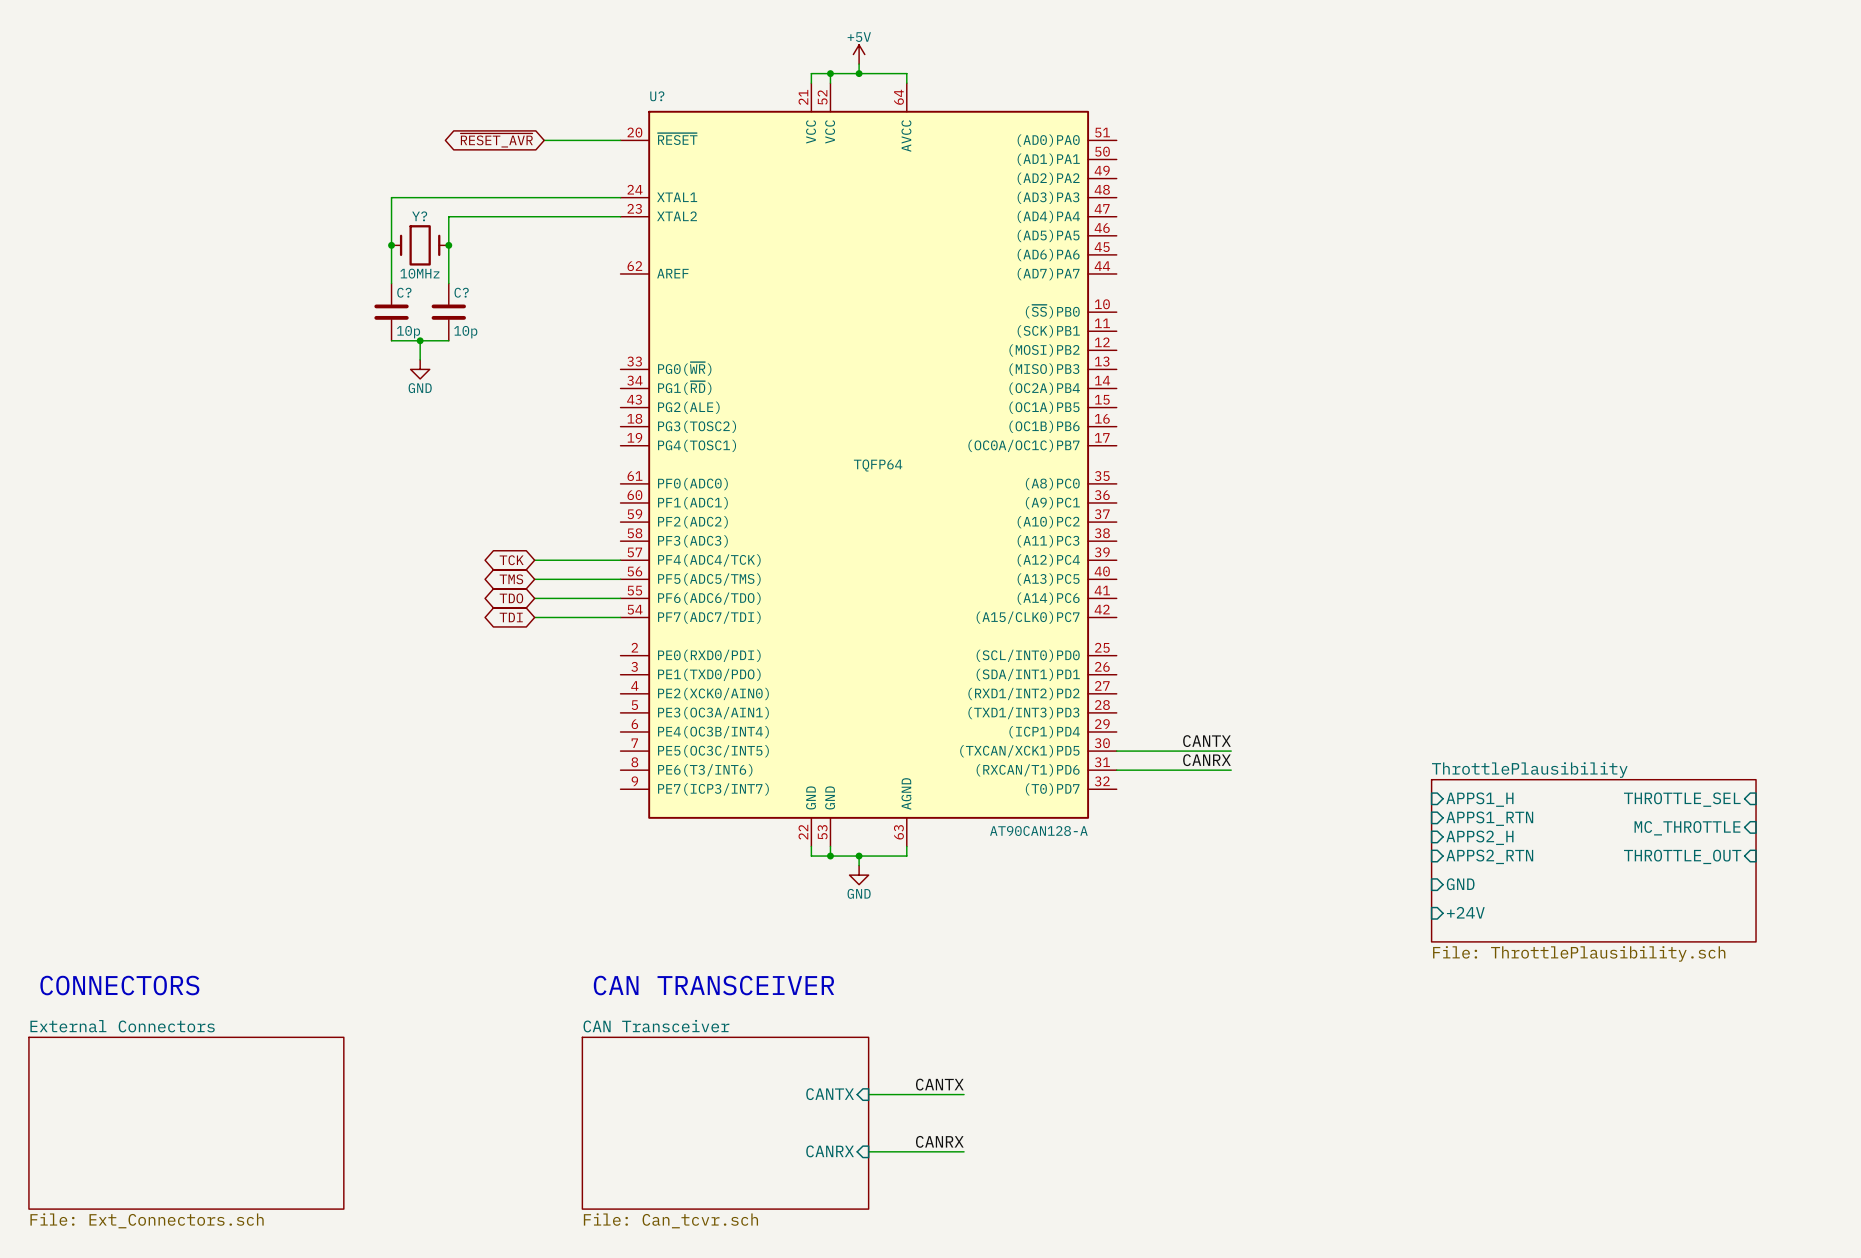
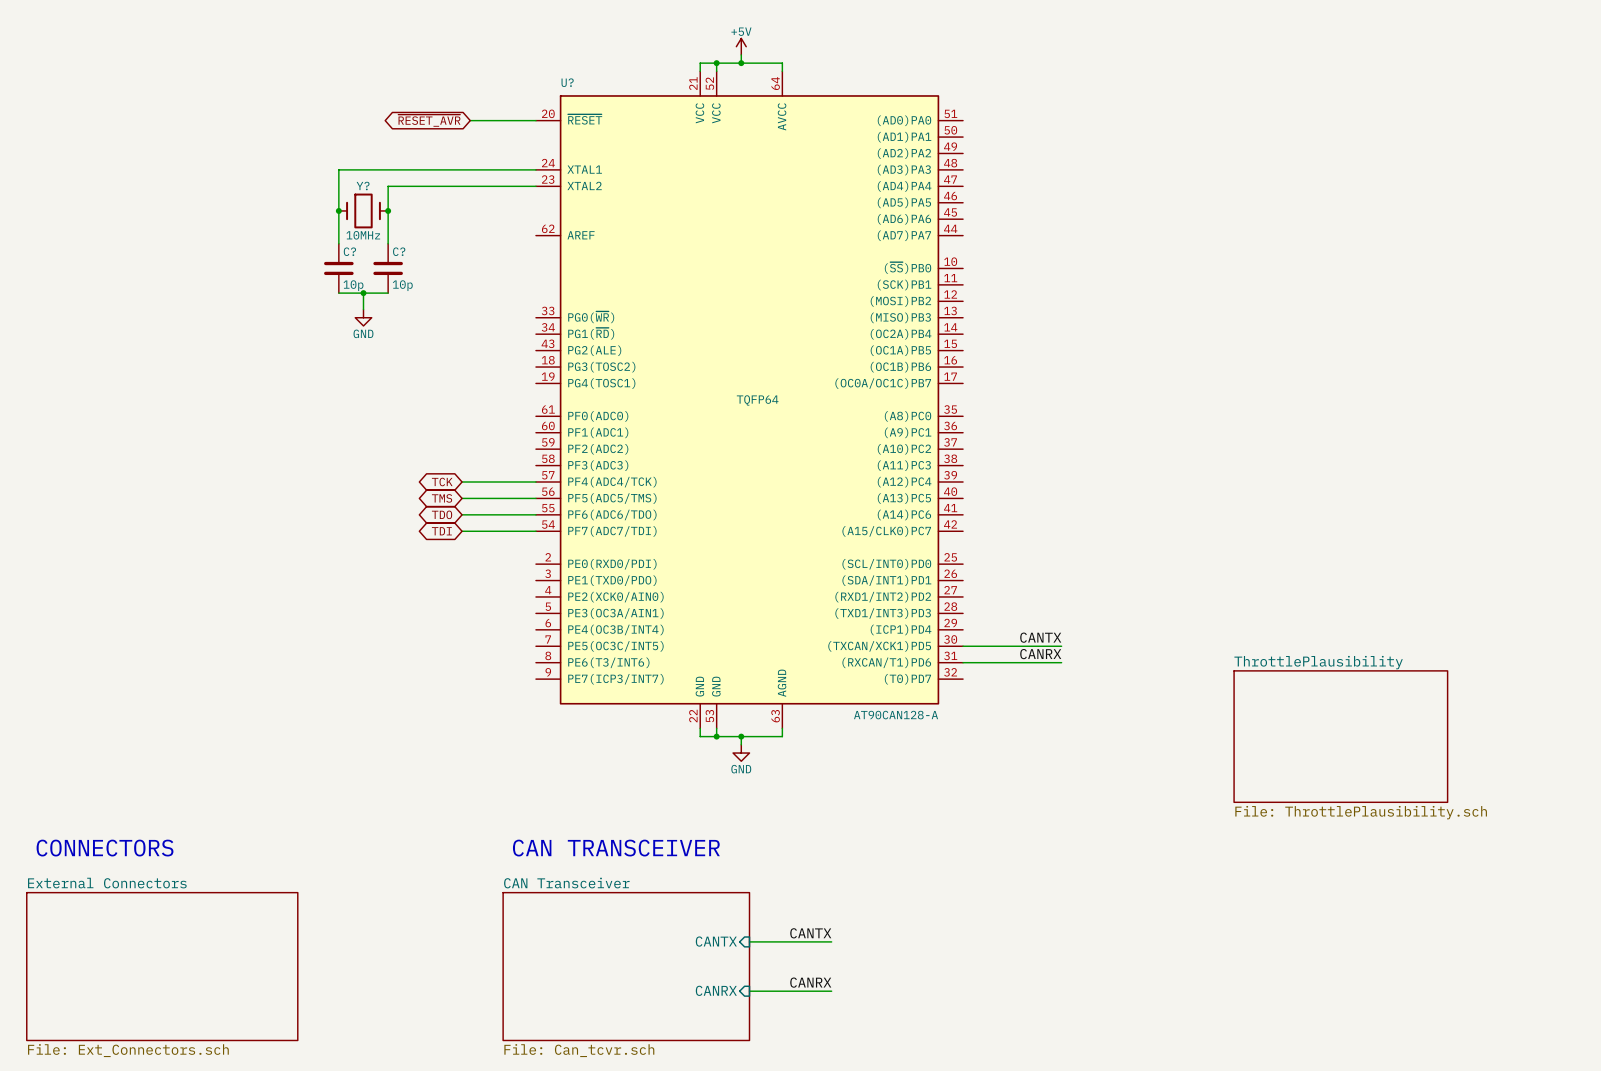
sheet pin: APPS1_H (1479, 799) -> none
sheet pin: THROTTLE_SEL (1682, 799) -> none
sheet pin: APPS1_RTN (1489, 818) -> none
sheet pin: MC_THROTTLE (1687, 828) -> none
sheet pin: APPS2_H (1479, 837) -> none
sheet pin: APPS2_RTN (1489, 856) -> none
sheet ThrottlePlausibility: none -> File: ThrottlePlausibility.sch (1340, 736)
sheet pin: THROTTLE_OUT (1682, 856) -> none
sheet ThrottlePlausibility: File: ThrottlePlausibility.sch (1593, 860) -> none
sheet pin: GND (1460, 884) -> none
sheet pin: +24V (1465, 912) -> none

